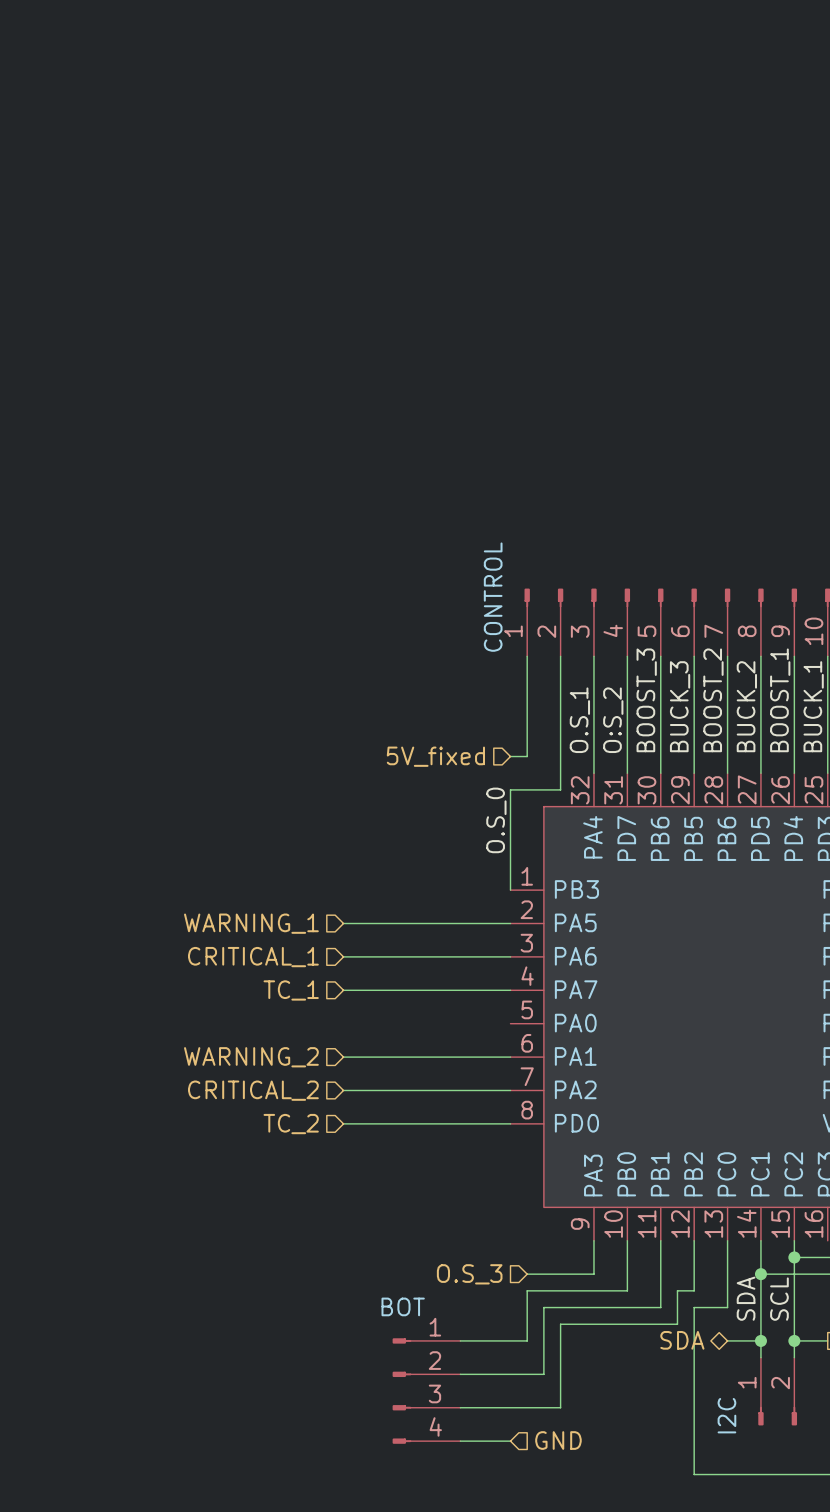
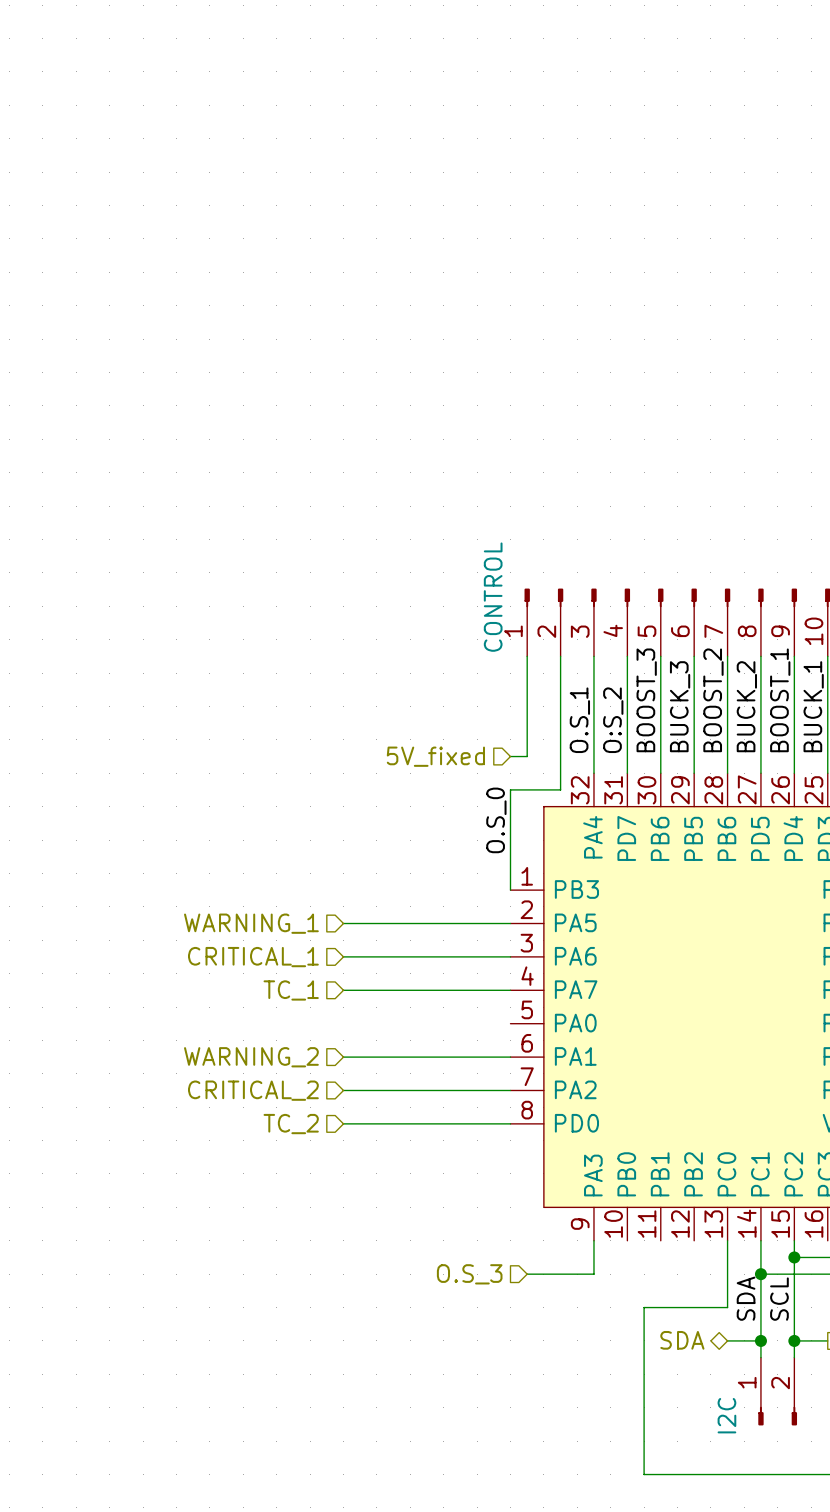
wire: (627, 1240) (627, 1290) (527, 1290) (527, 1340) (460, 1340) -> none
wire: (660, 1240) (660, 1307) -> (694, 1307) (660, 1307)
wire: (694, 1240) (694, 1290) (677, 1290) (677, 1324) (560, 1324) (560, 1407) (460, 1407) -> none
wire: (644, 1307) (543, 1307) (543, 1374) (460, 1374) -> none
wire: (694, 1307) (694, 1474) -> (644, 1307) (644, 1474) (694, 1474)
part: BOT (426, 1391) -> none
hierarchical label: GND (558, 1440) -> none
wire: (460, 1441) (510, 1441) -> none

